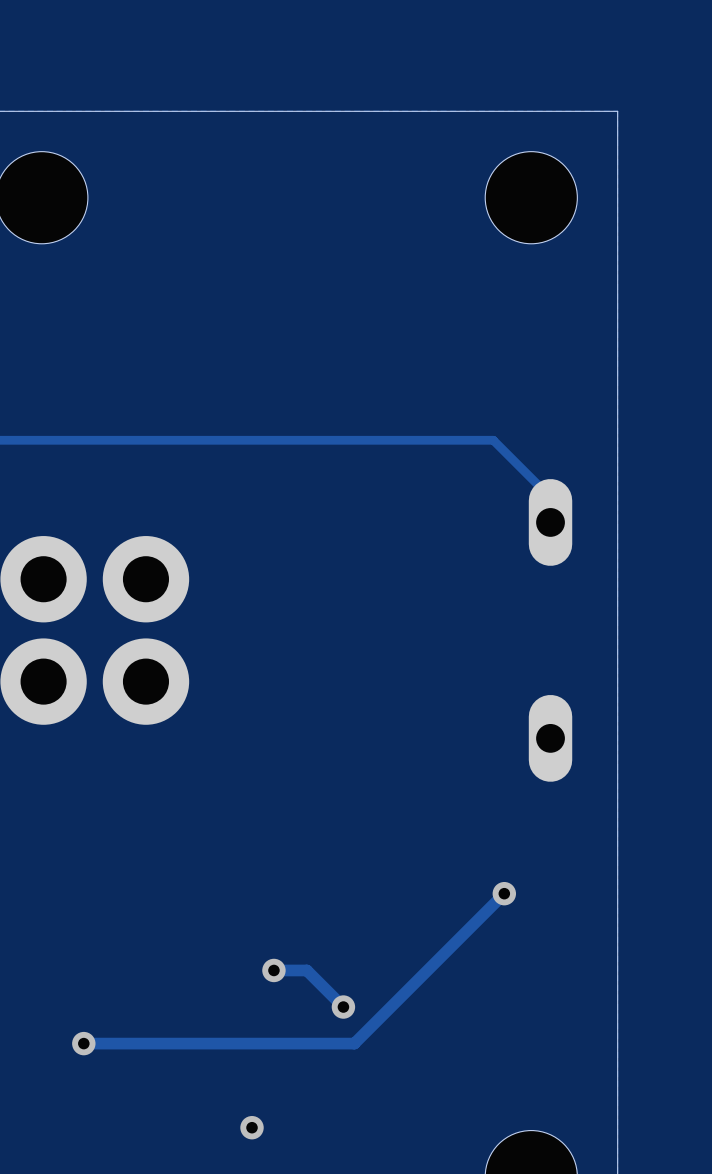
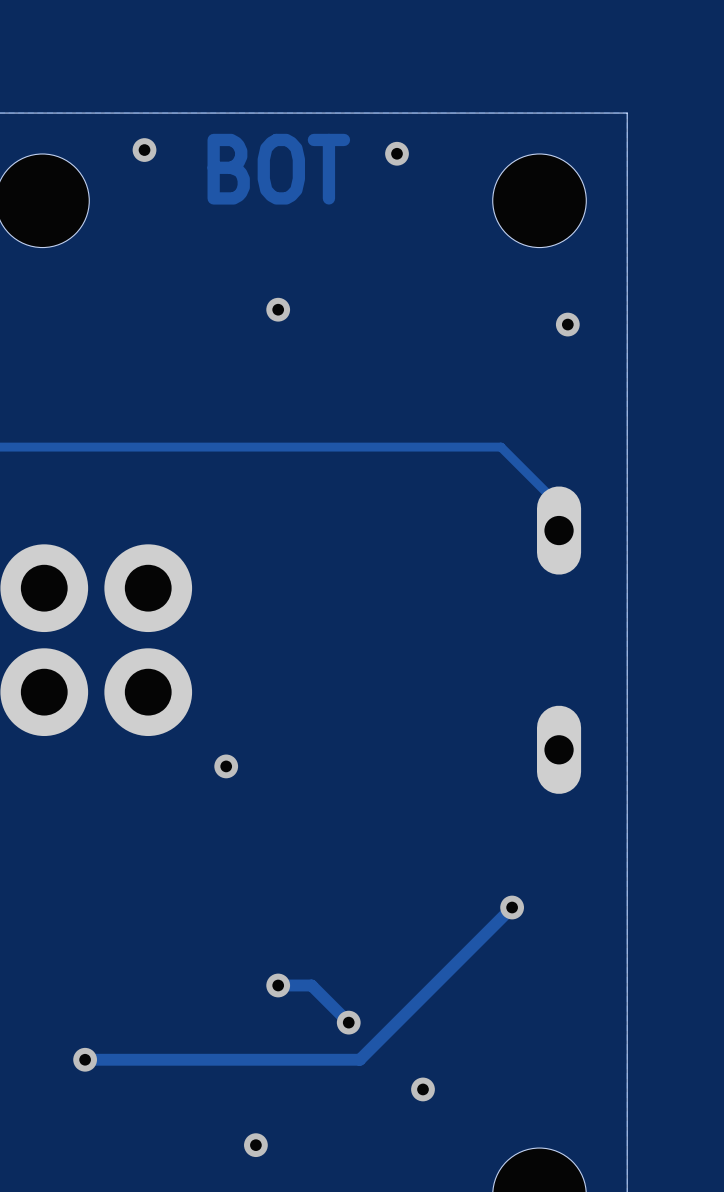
via: none -> (144, 150)
via: none -> (397, 153)
text: none -> BOT (278, 169)
via: none -> (278, 309)
via: none -> (567, 324)
via: none -> (226, 766)
via: none -> (423, 1089)

